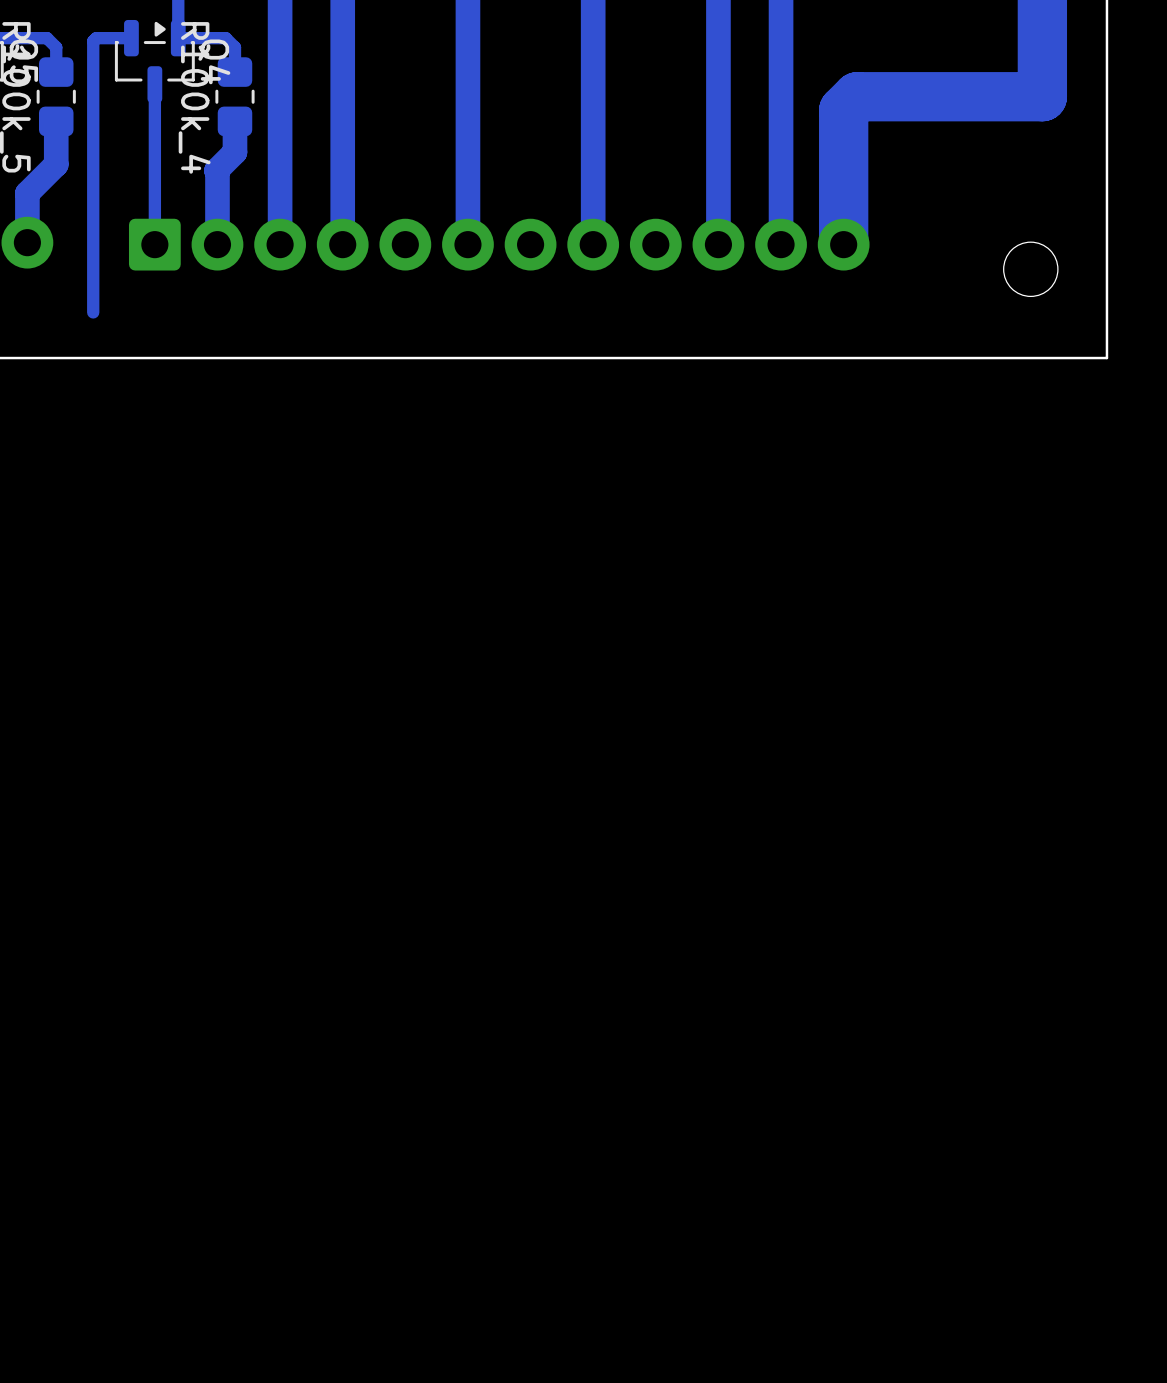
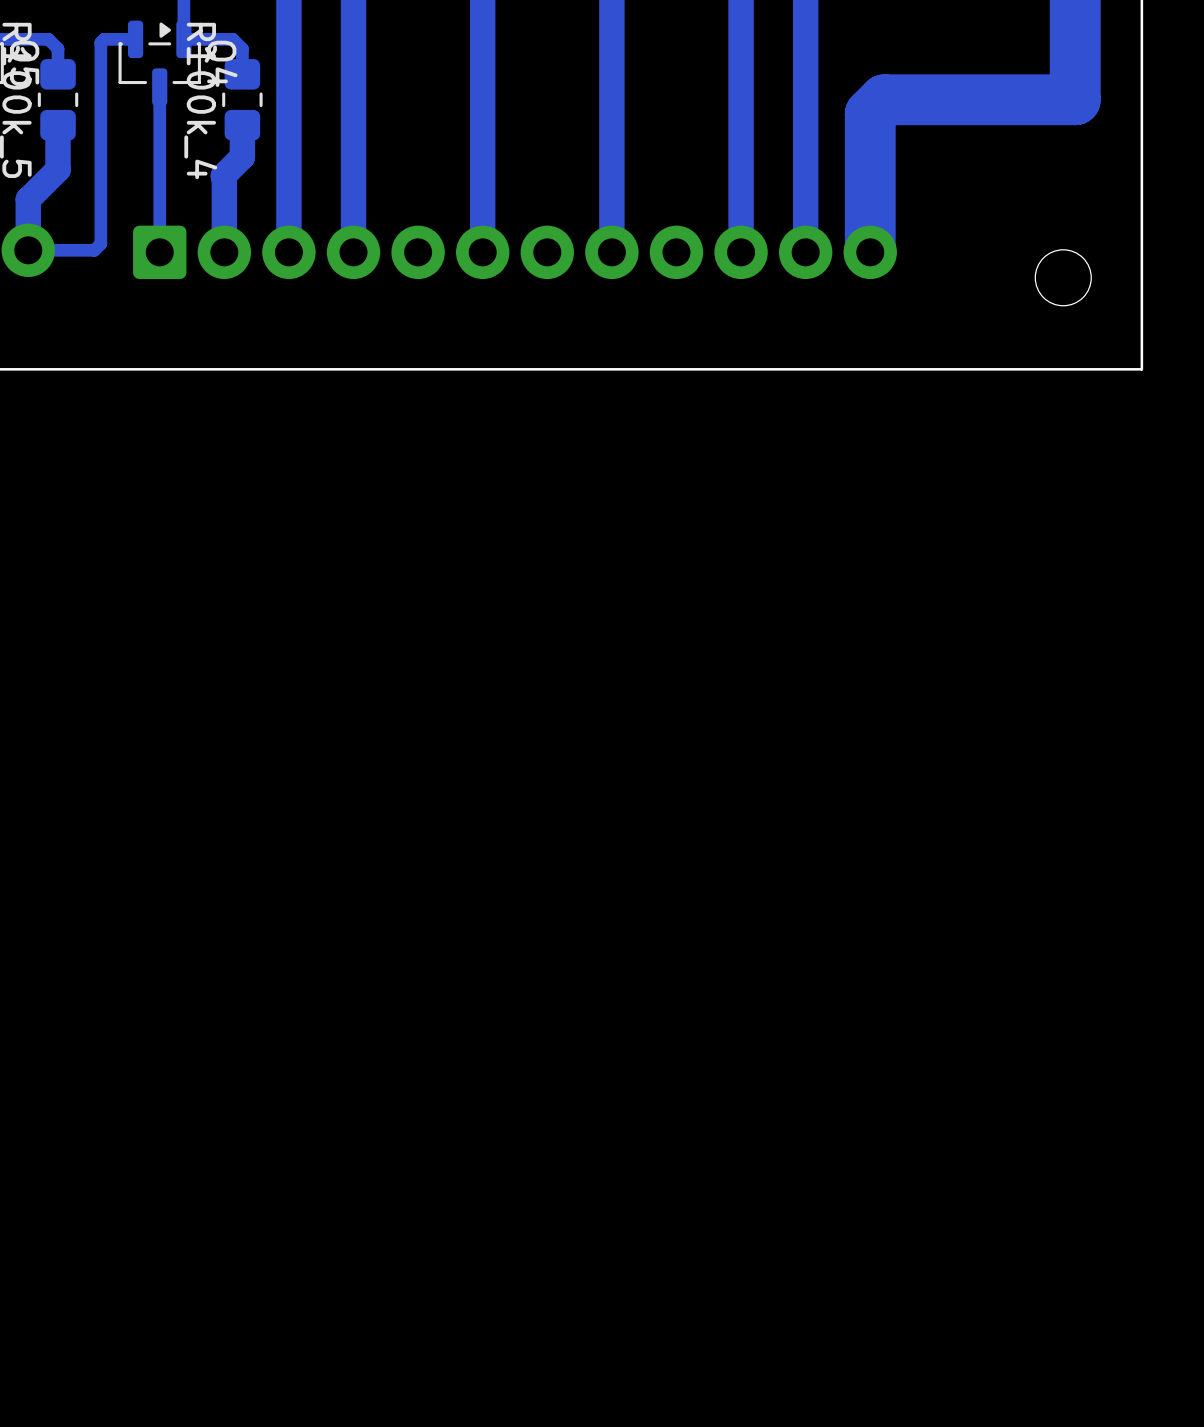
track: (100, 38) (96, 38) (93, 41) (93, 312) -> (104, 39) (100, 42) (100, 243) (94, 250) (28, 250)

